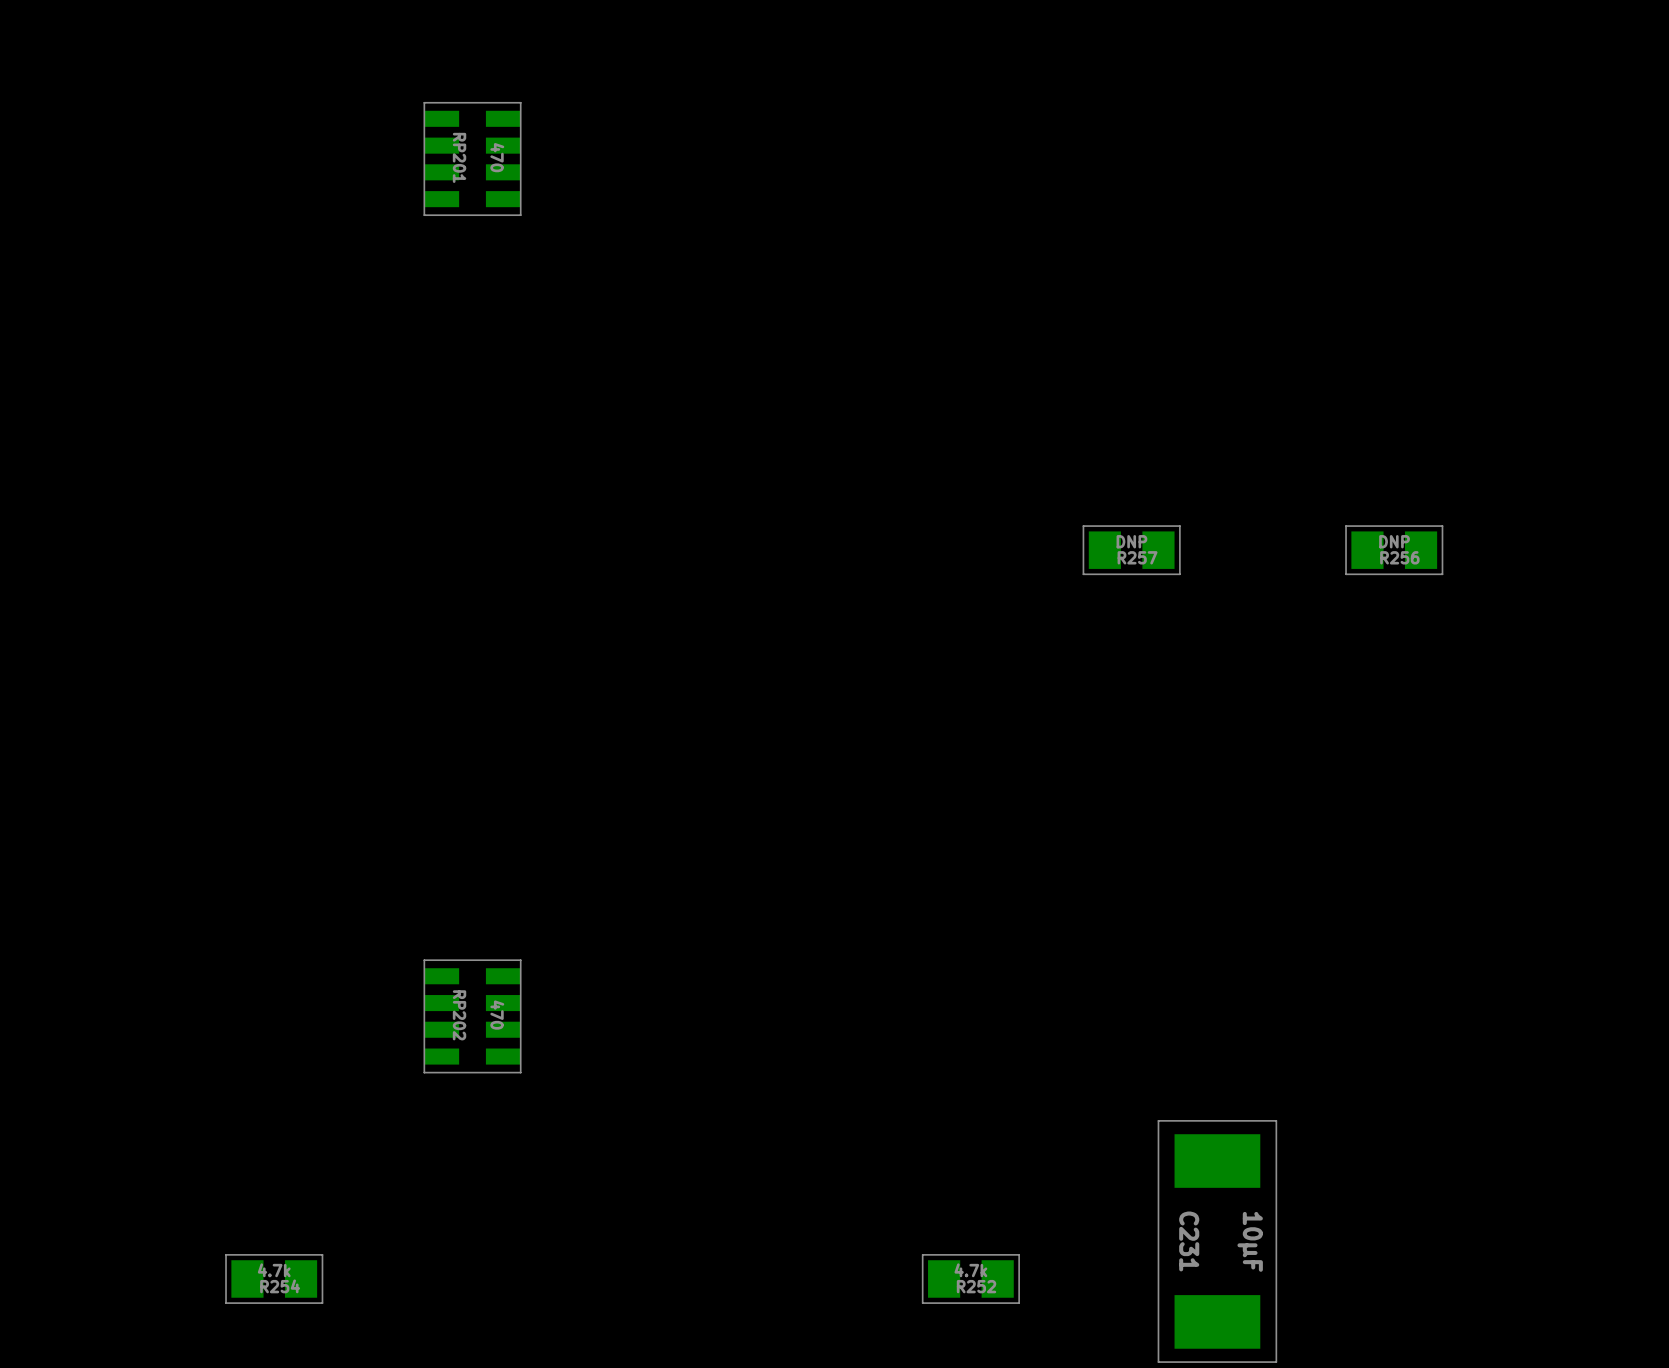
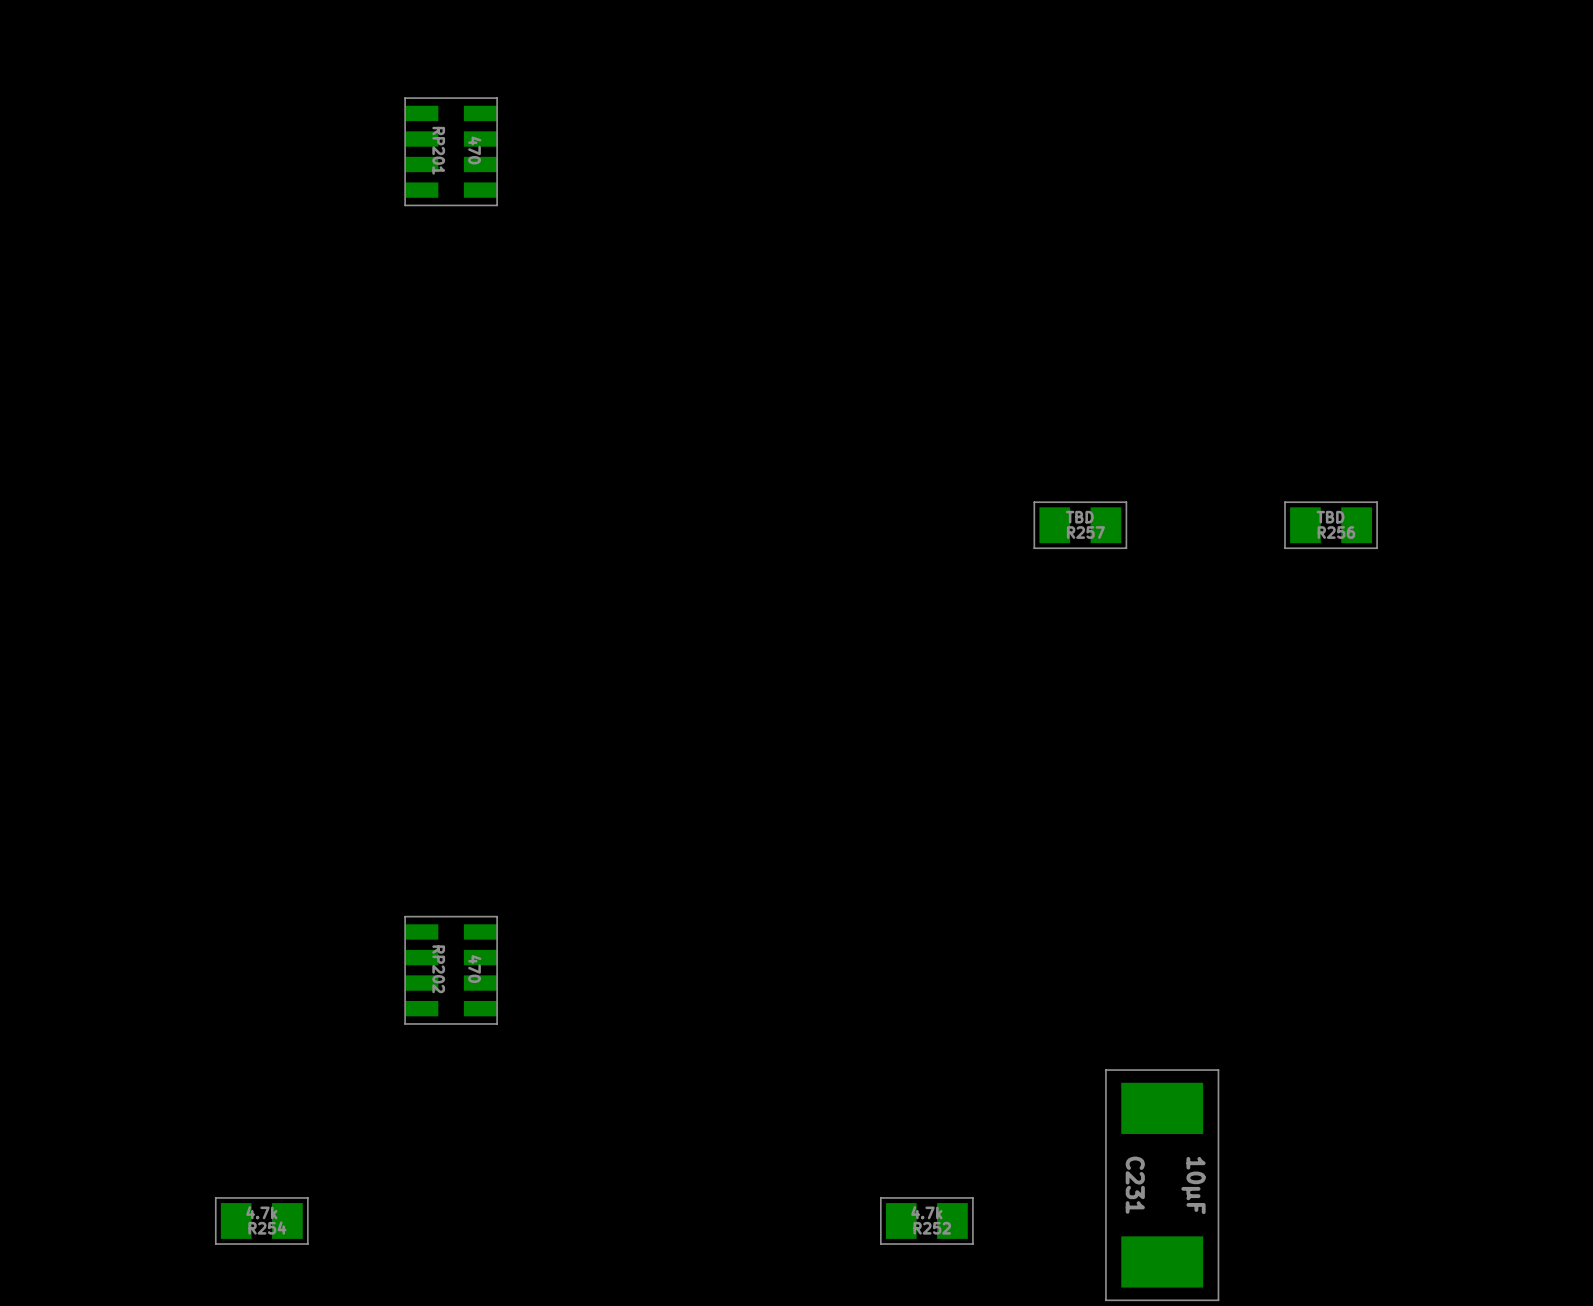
R257 value: DNP (1131, 541) -> TBD (1079, 517)
R256 value: DNP (1394, 541) -> TBD (1330, 517)

